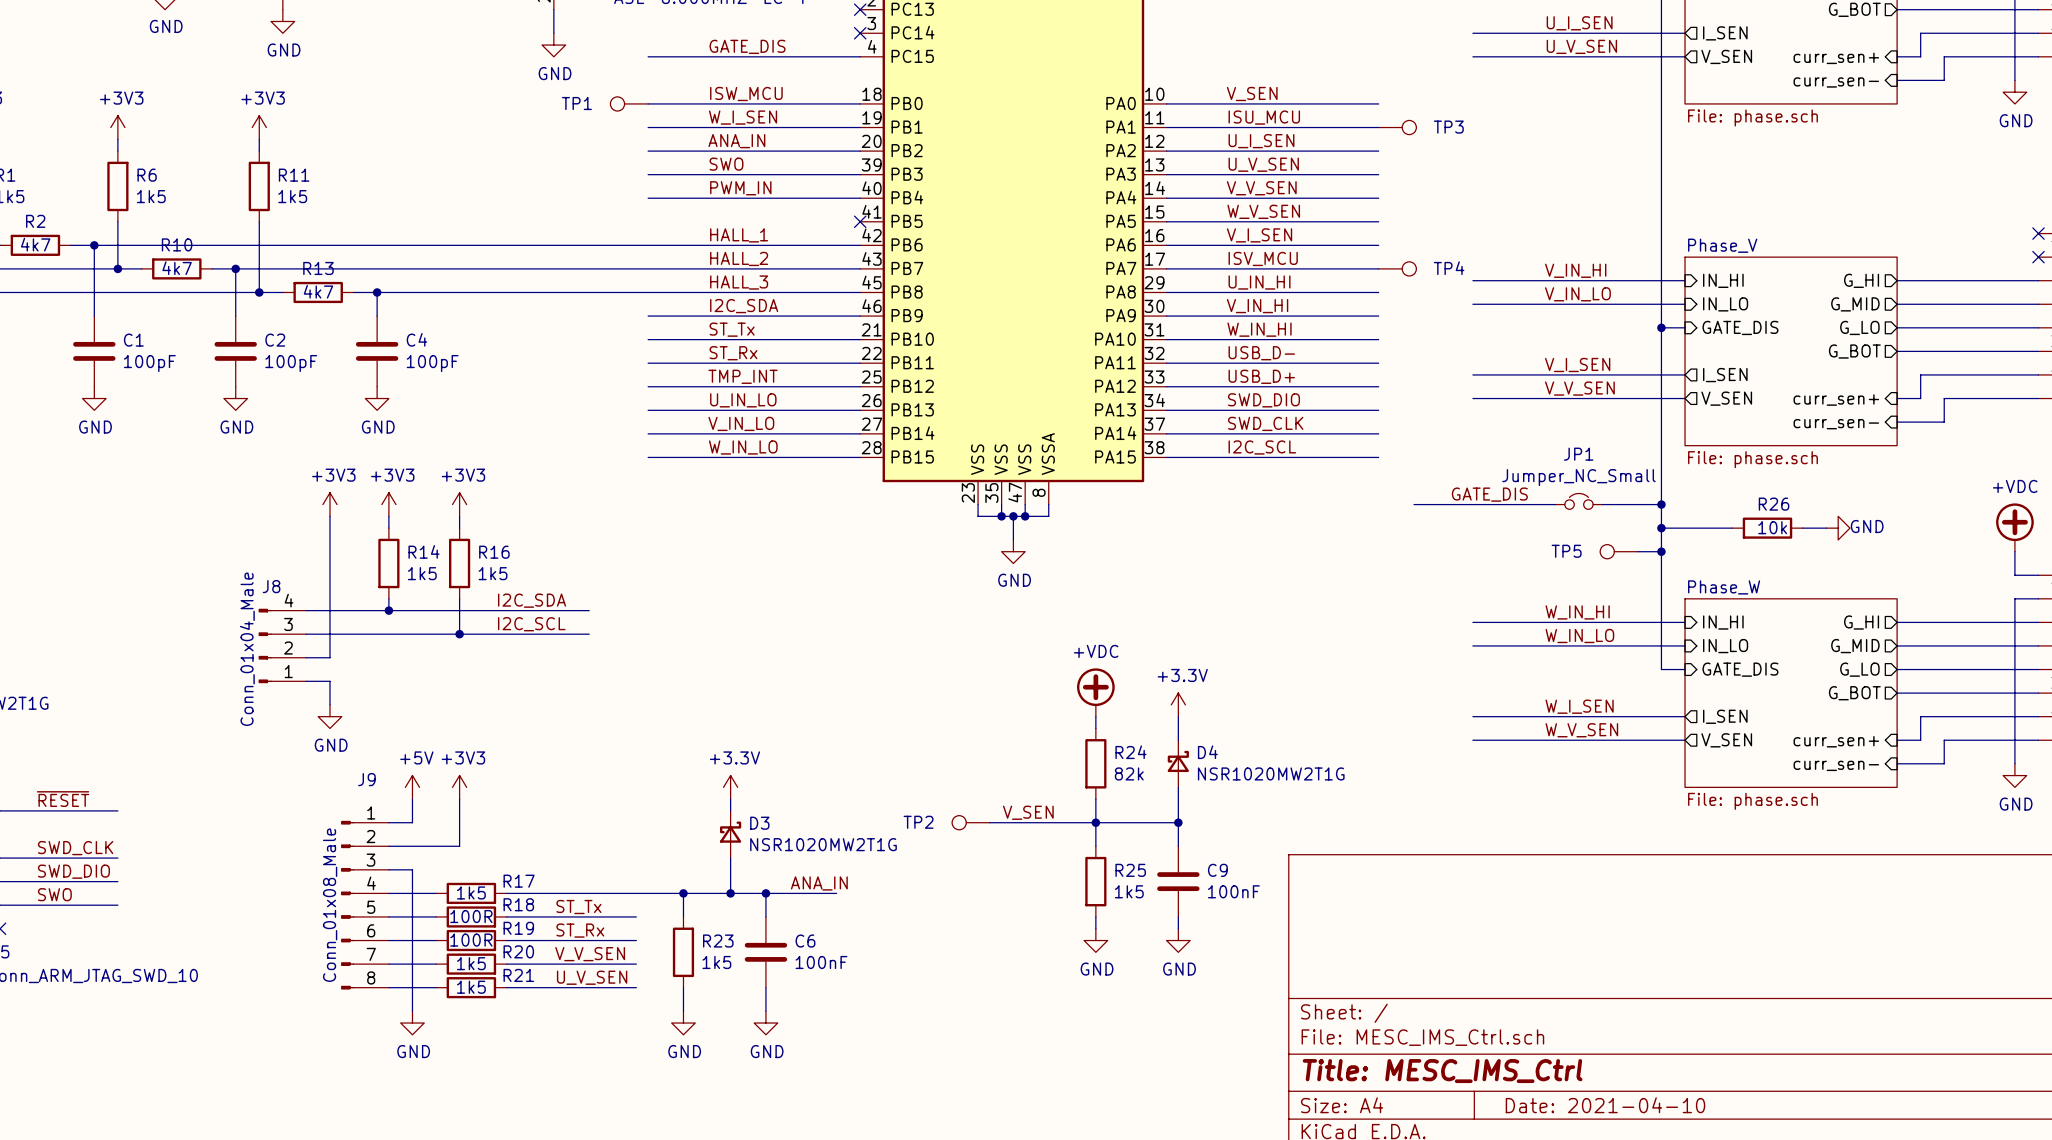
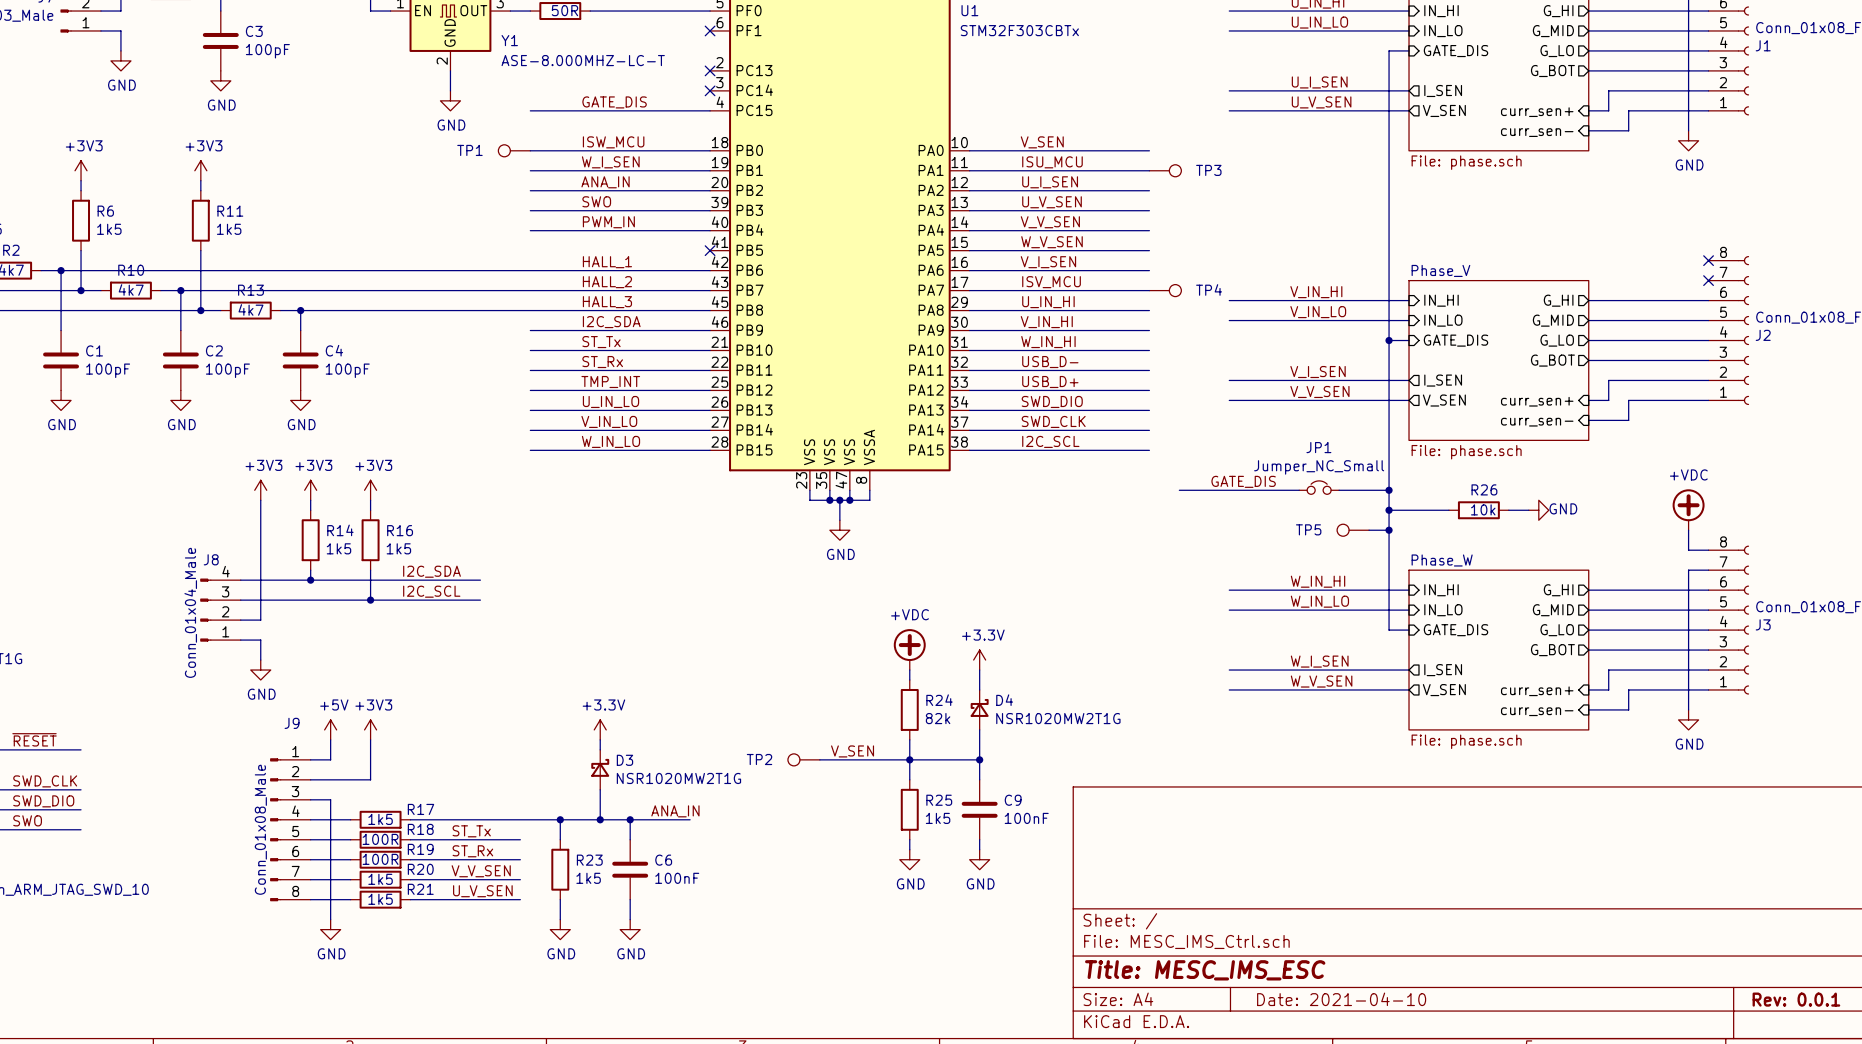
title block: Title: MESC_IMS_Ctrl (1442, 1071) -> Title: MESC_IMS_ESC (1205, 970)

